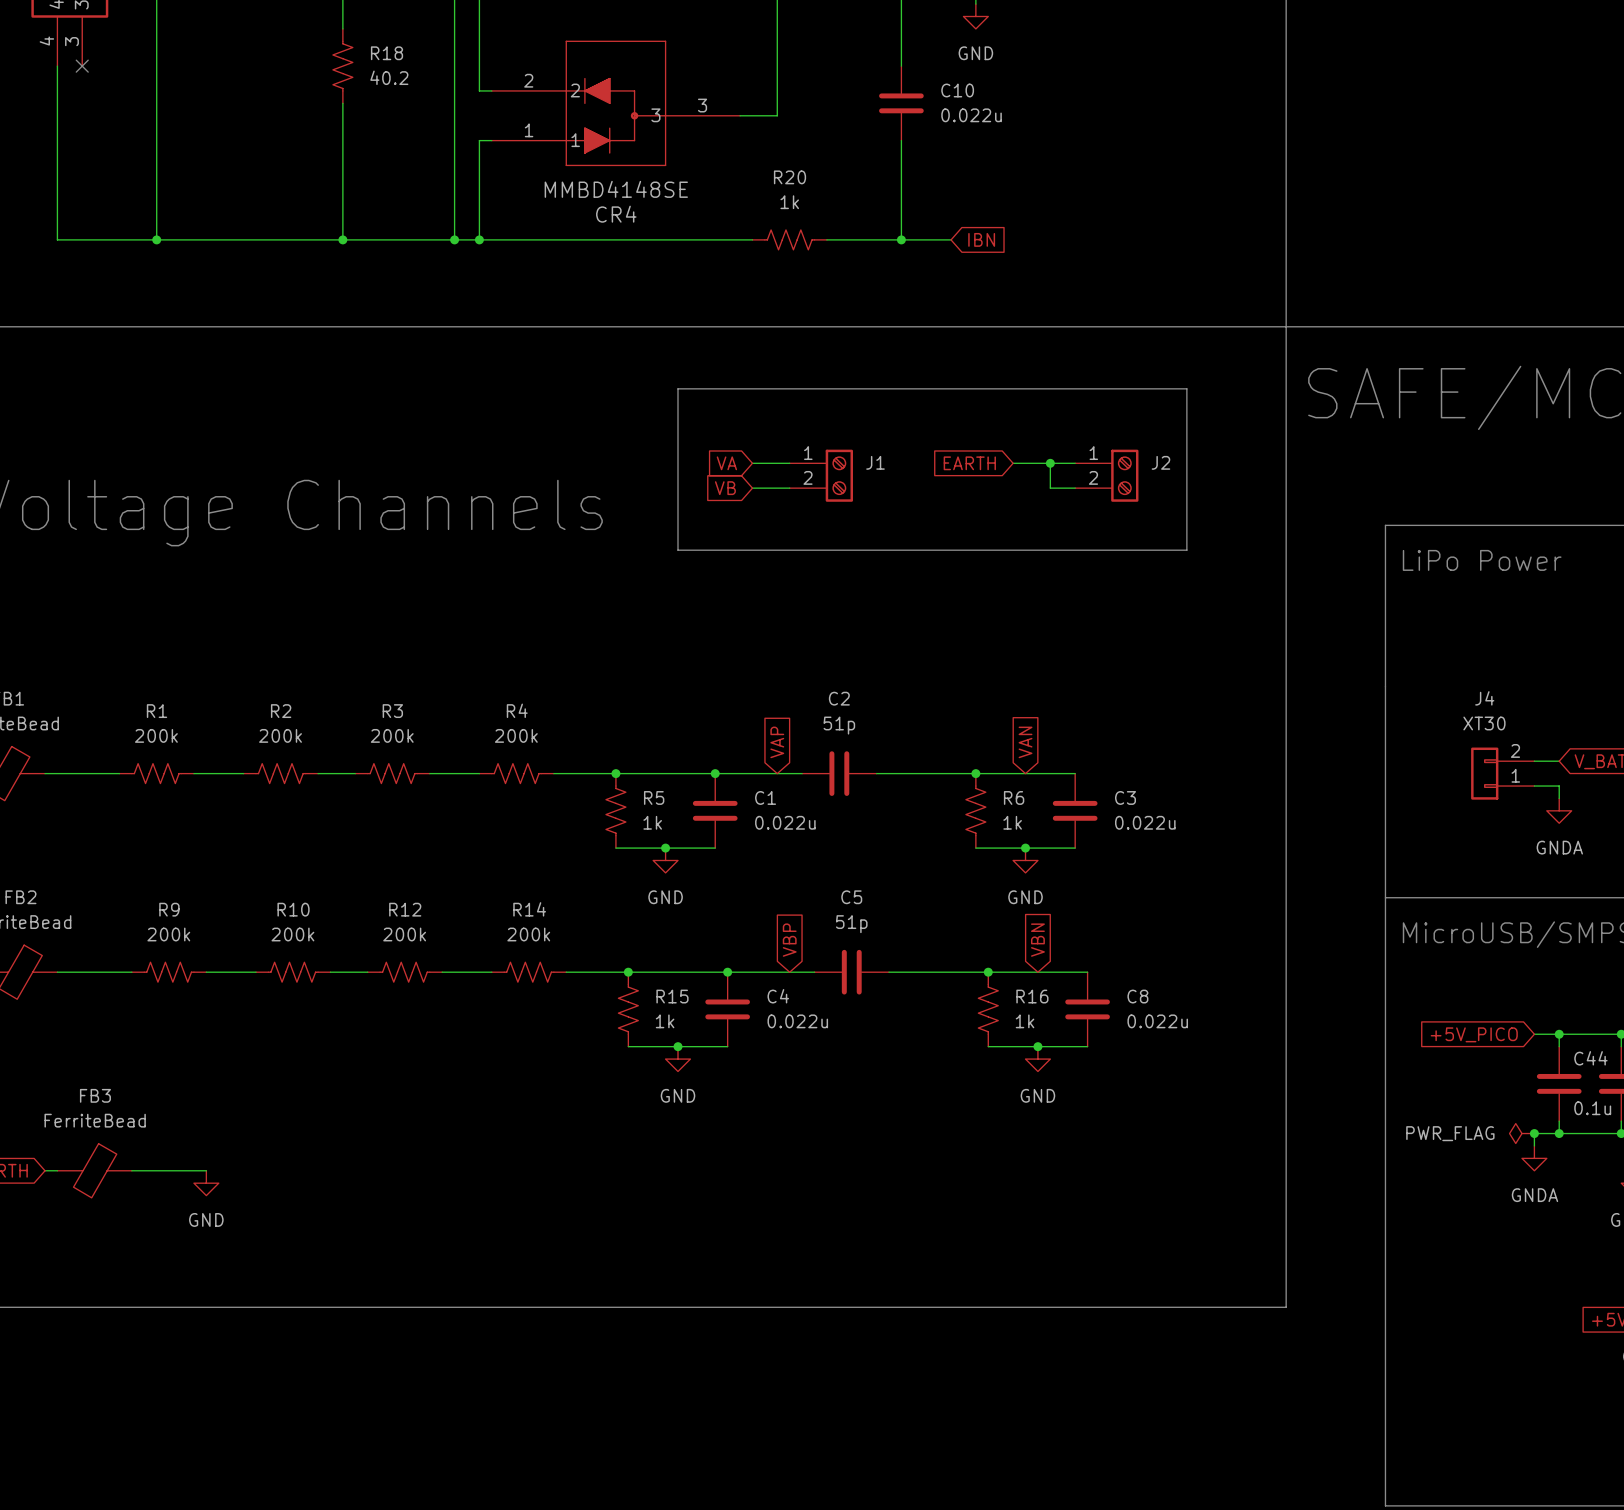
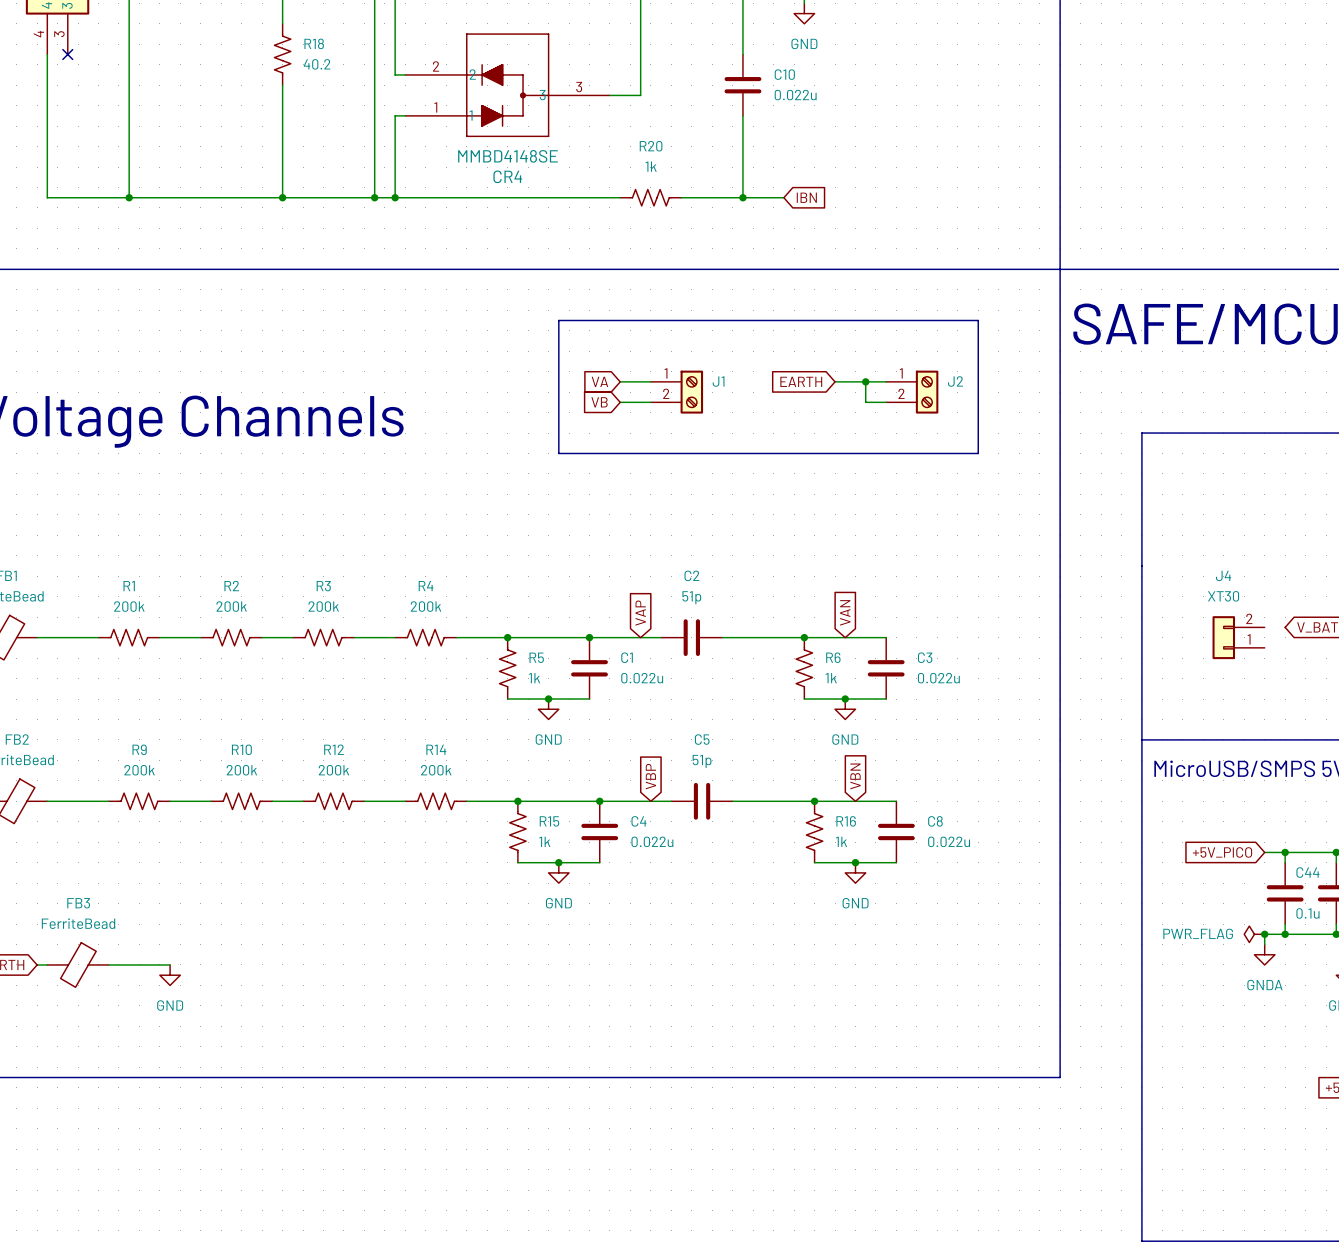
text: LiPo Power (1482, 560) -> none
wire: (1534, 761) (1559, 761) -> none
wire: (1534, 786) (1559, 786) (1559, 798) -> none
power symbol: GNDA (1559, 810) -> none

